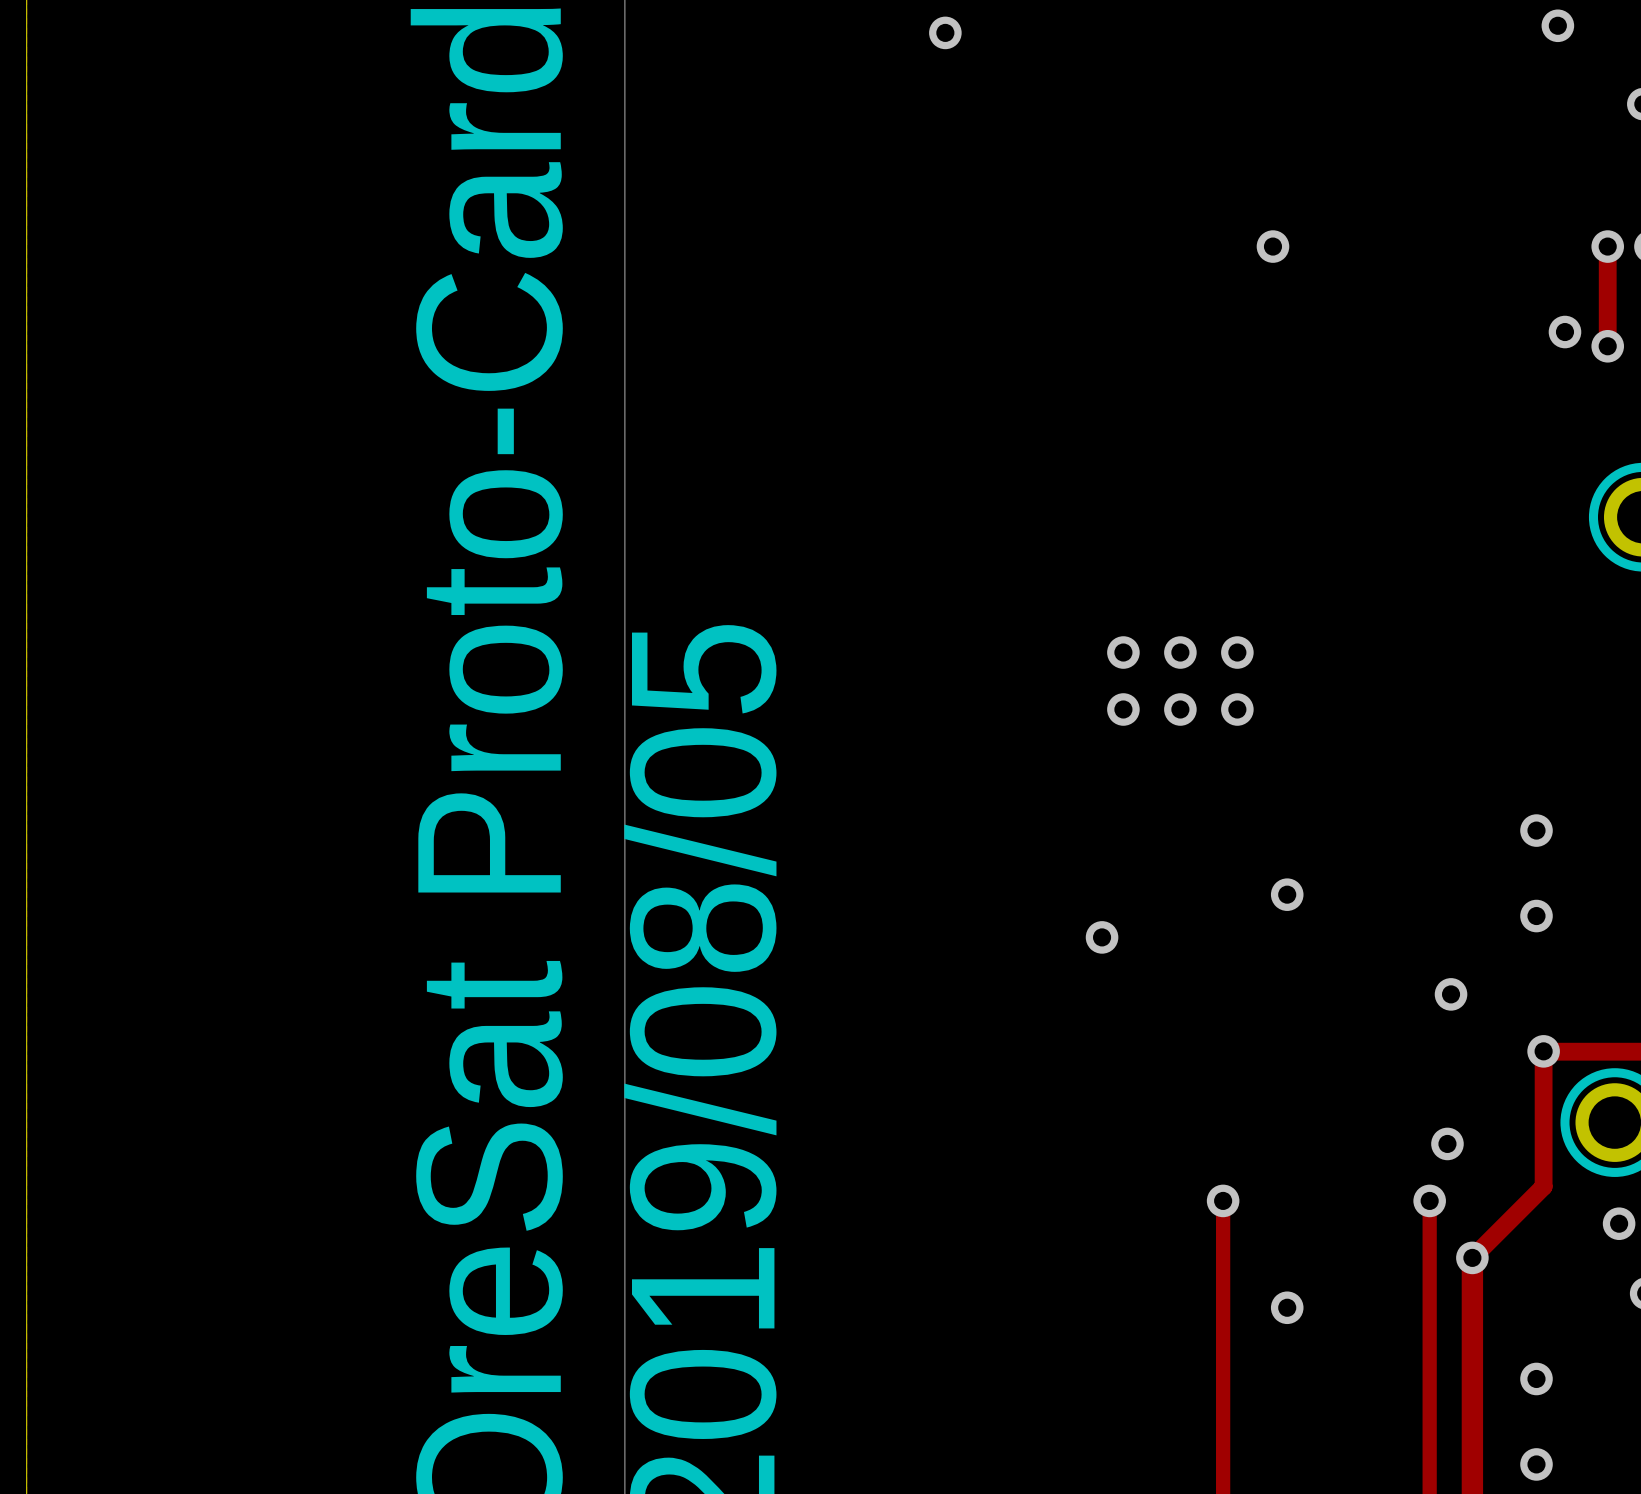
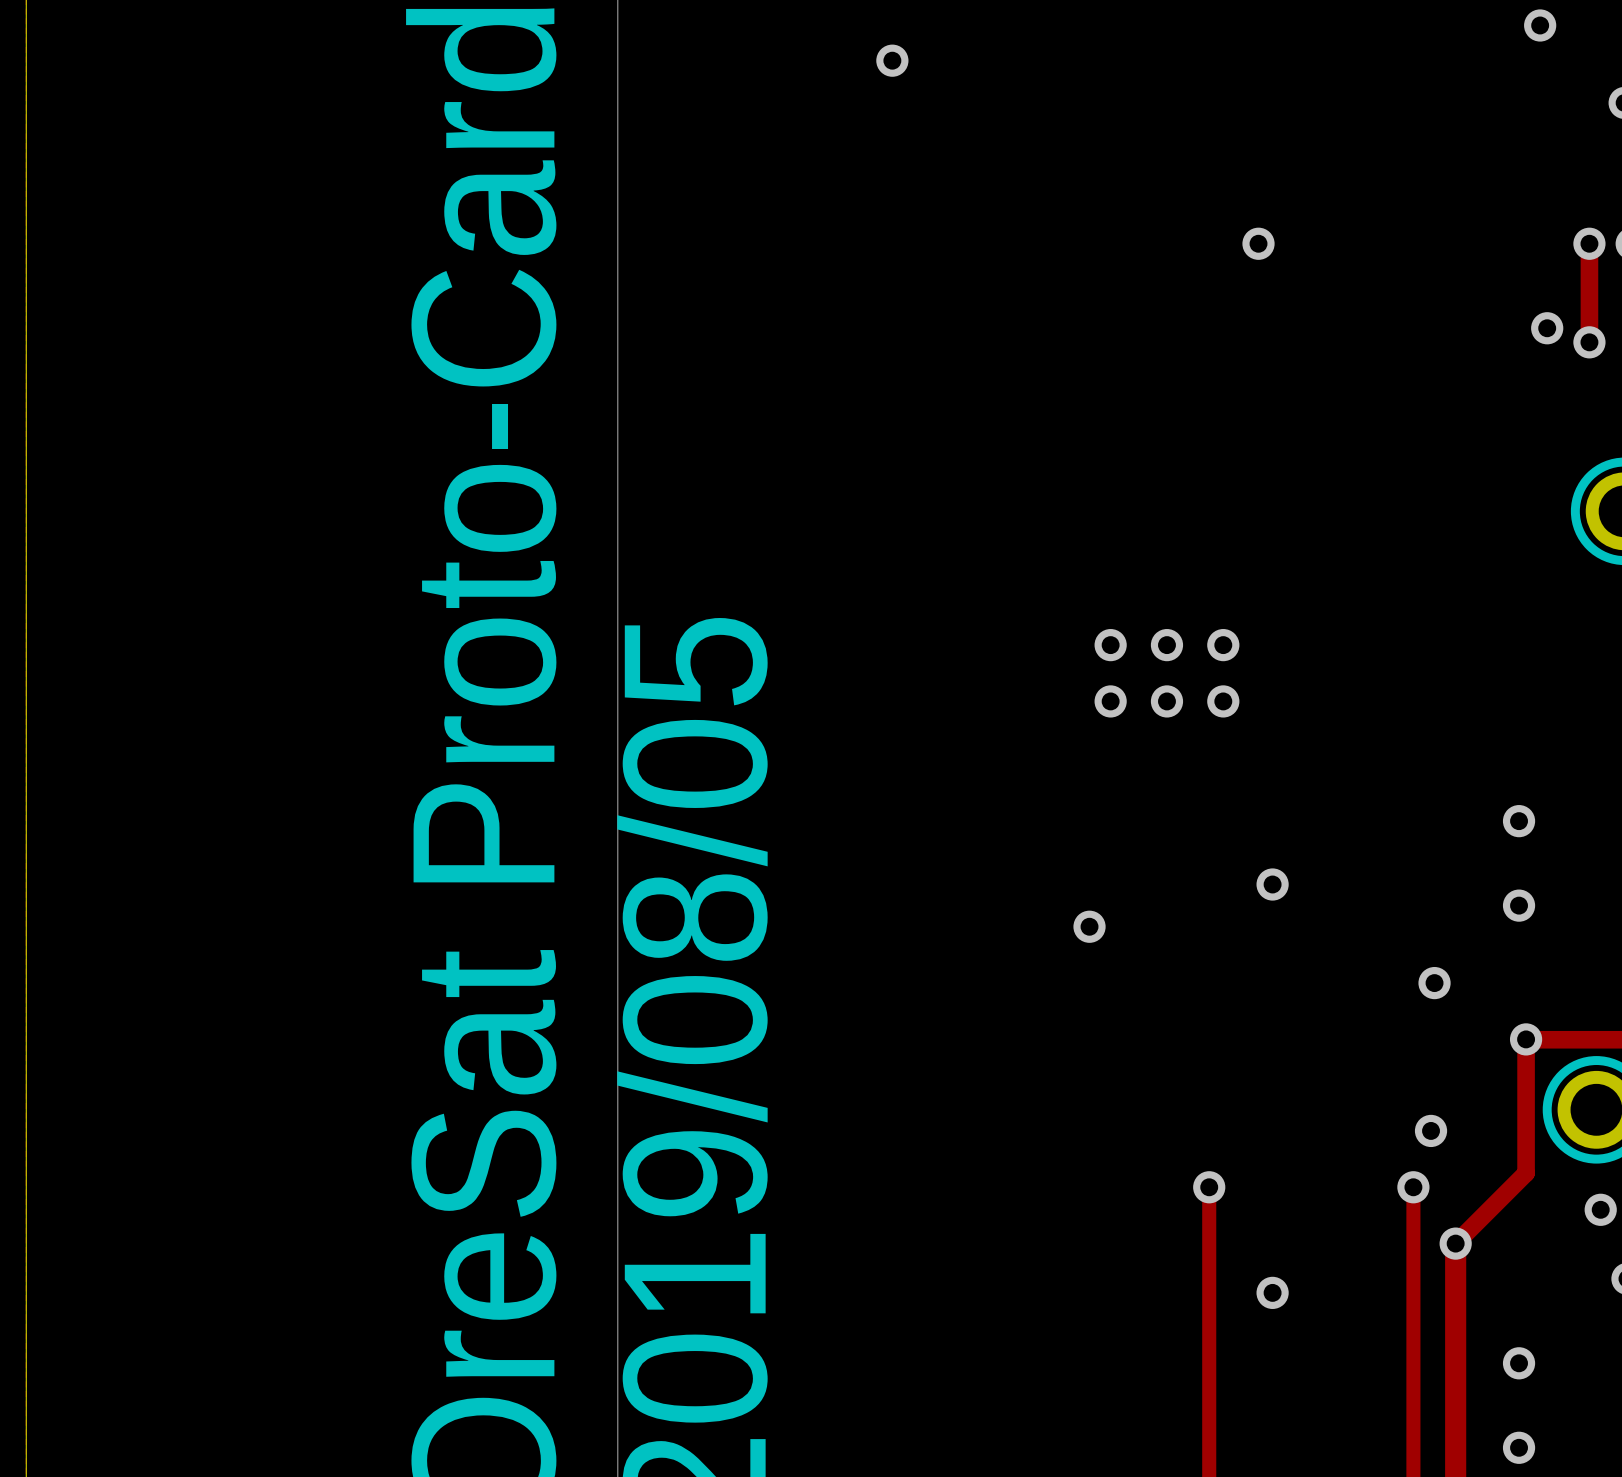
via position: (945, 32) -> (892, 60)

